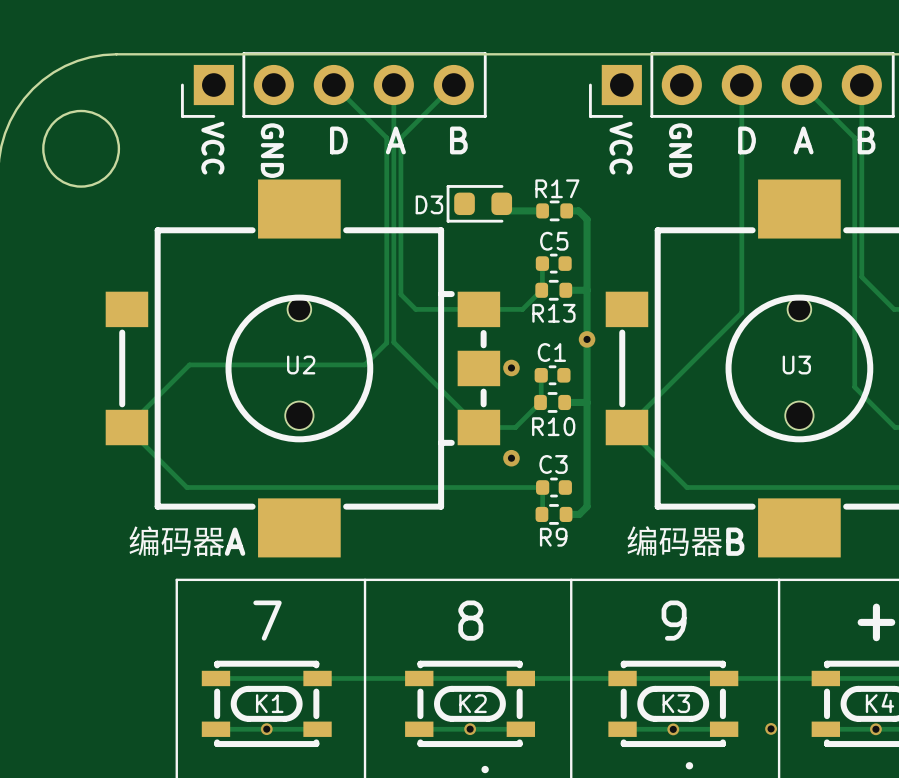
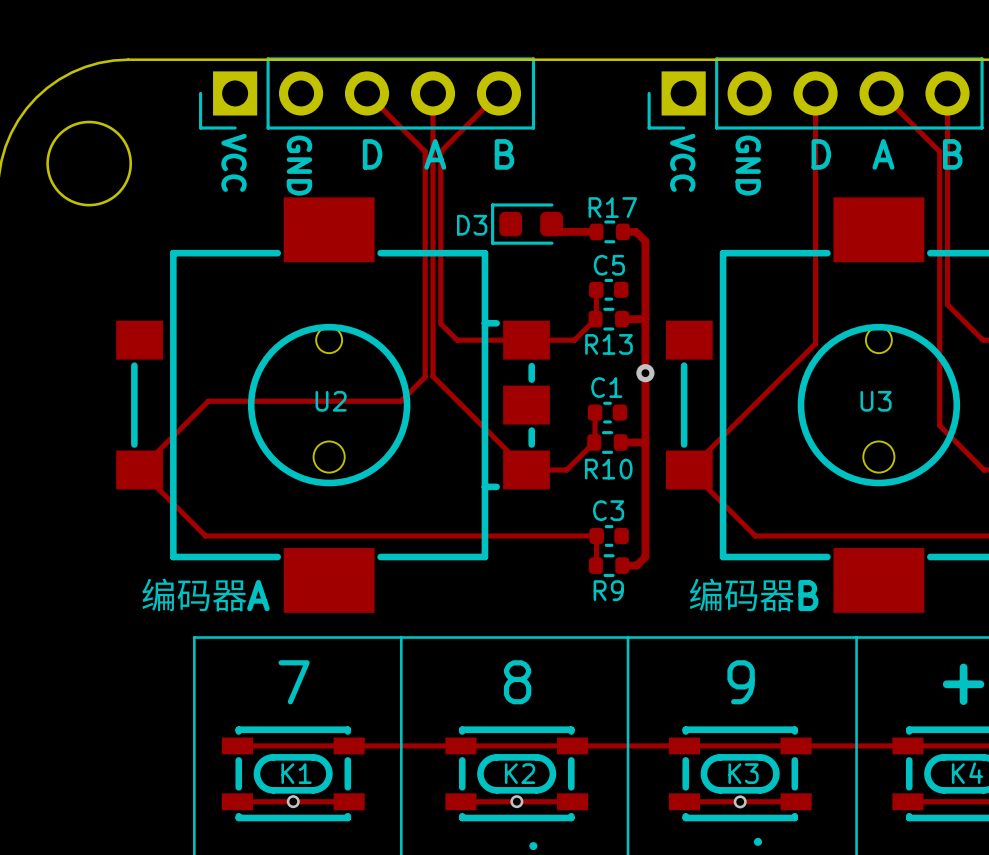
via: (511, 367) -> none
via: (511, 458) -> none
via: (771, 728) -> none
via: (875, 729) -> none

